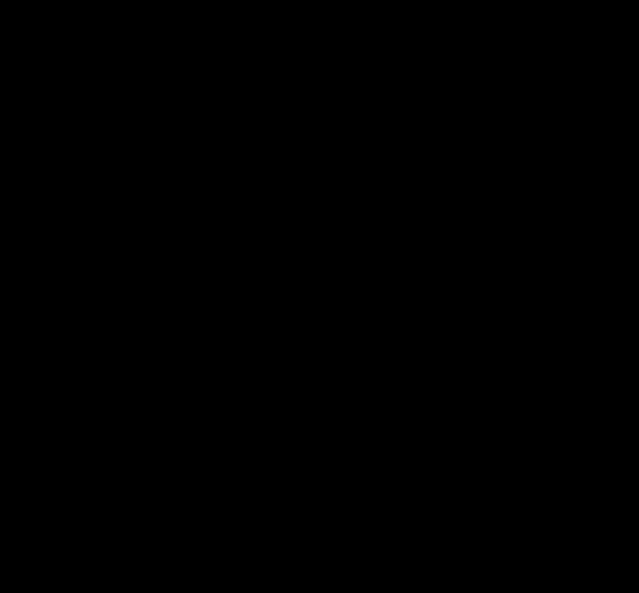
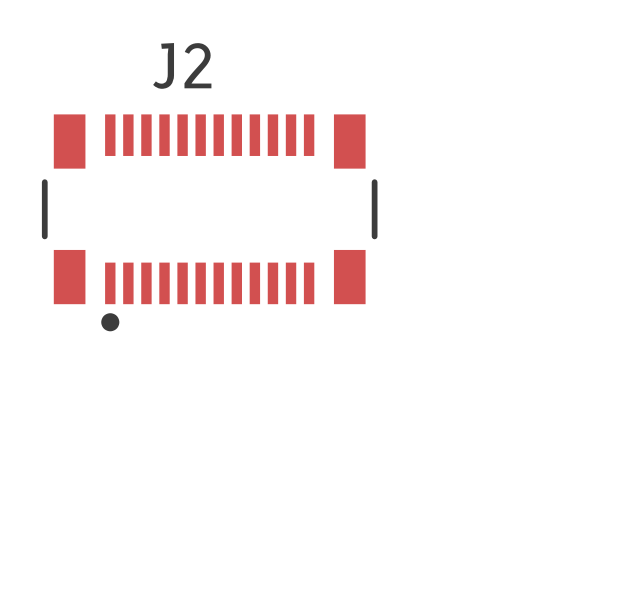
J2: none -> (209, 222)

